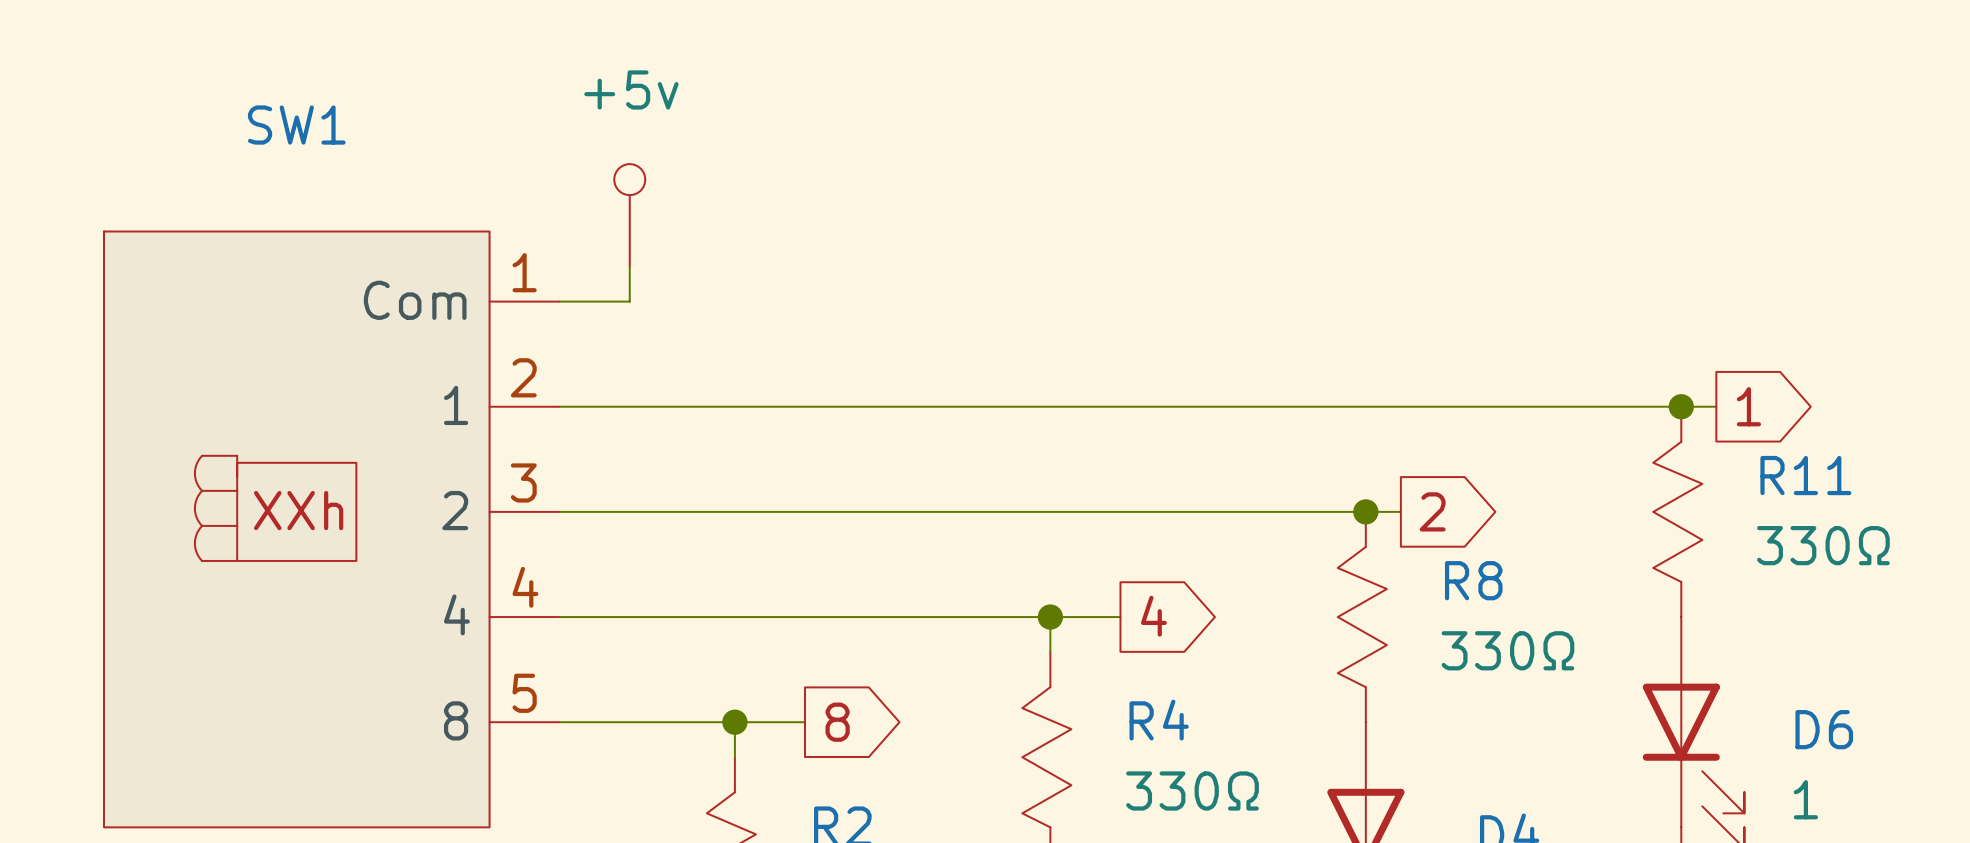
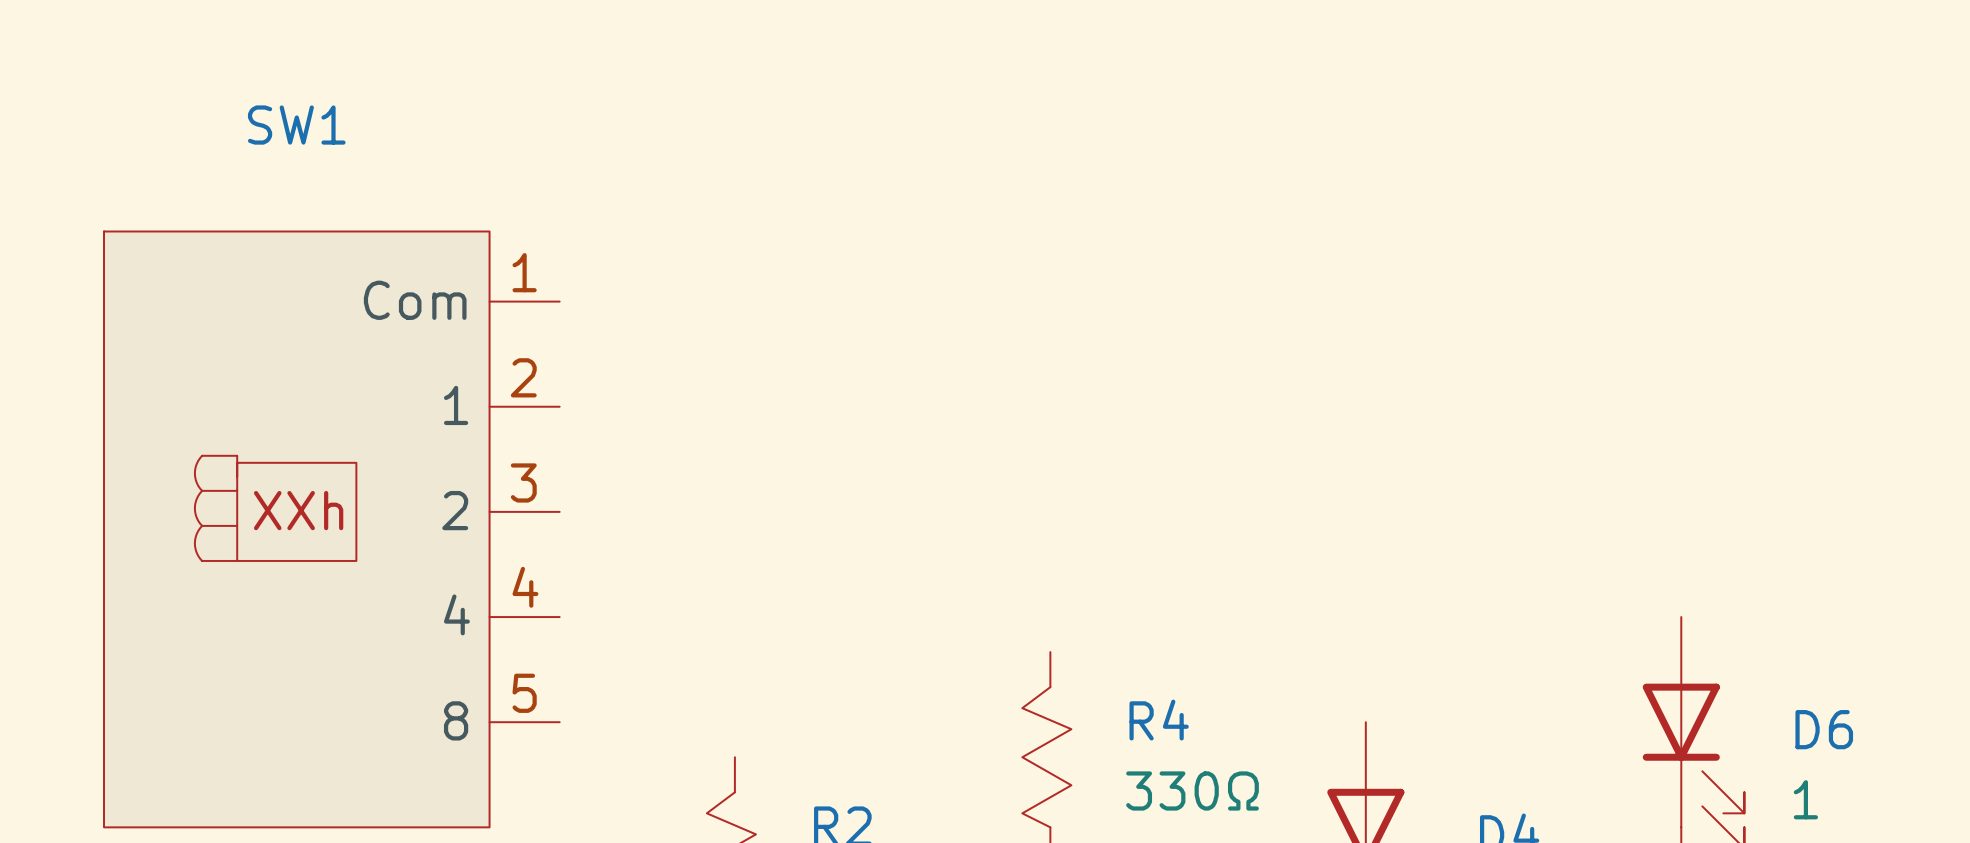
power symbol: +5v (629, 215) -> none
wire: (629, 266) (629, 301) (559, 301) -> none
wire: (559, 406) (1716, 406) -> none
junction: (1681, 406) -> none
global label: 1 (1748, 406) -> none
wire: (559, 511) (1400, 511) -> none
junction: (1365, 511) -> none
global label: 2 (1432, 511) -> none
R11: 330Ω (1677, 511) -> none
global label: 4 (1153, 616) -> none
wire: (559, 617) (1120, 617) -> none
wire: (1050, 617) (1050, 652) -> none
junction: (1050, 617) -> none
R8: 330Ω (1362, 617) -> none
wire: (559, 722) (805, 722) -> none
wire: (734, 722) (734, 757) -> none
junction: (734, 722) -> none
global label: 8 (837, 722) -> none

